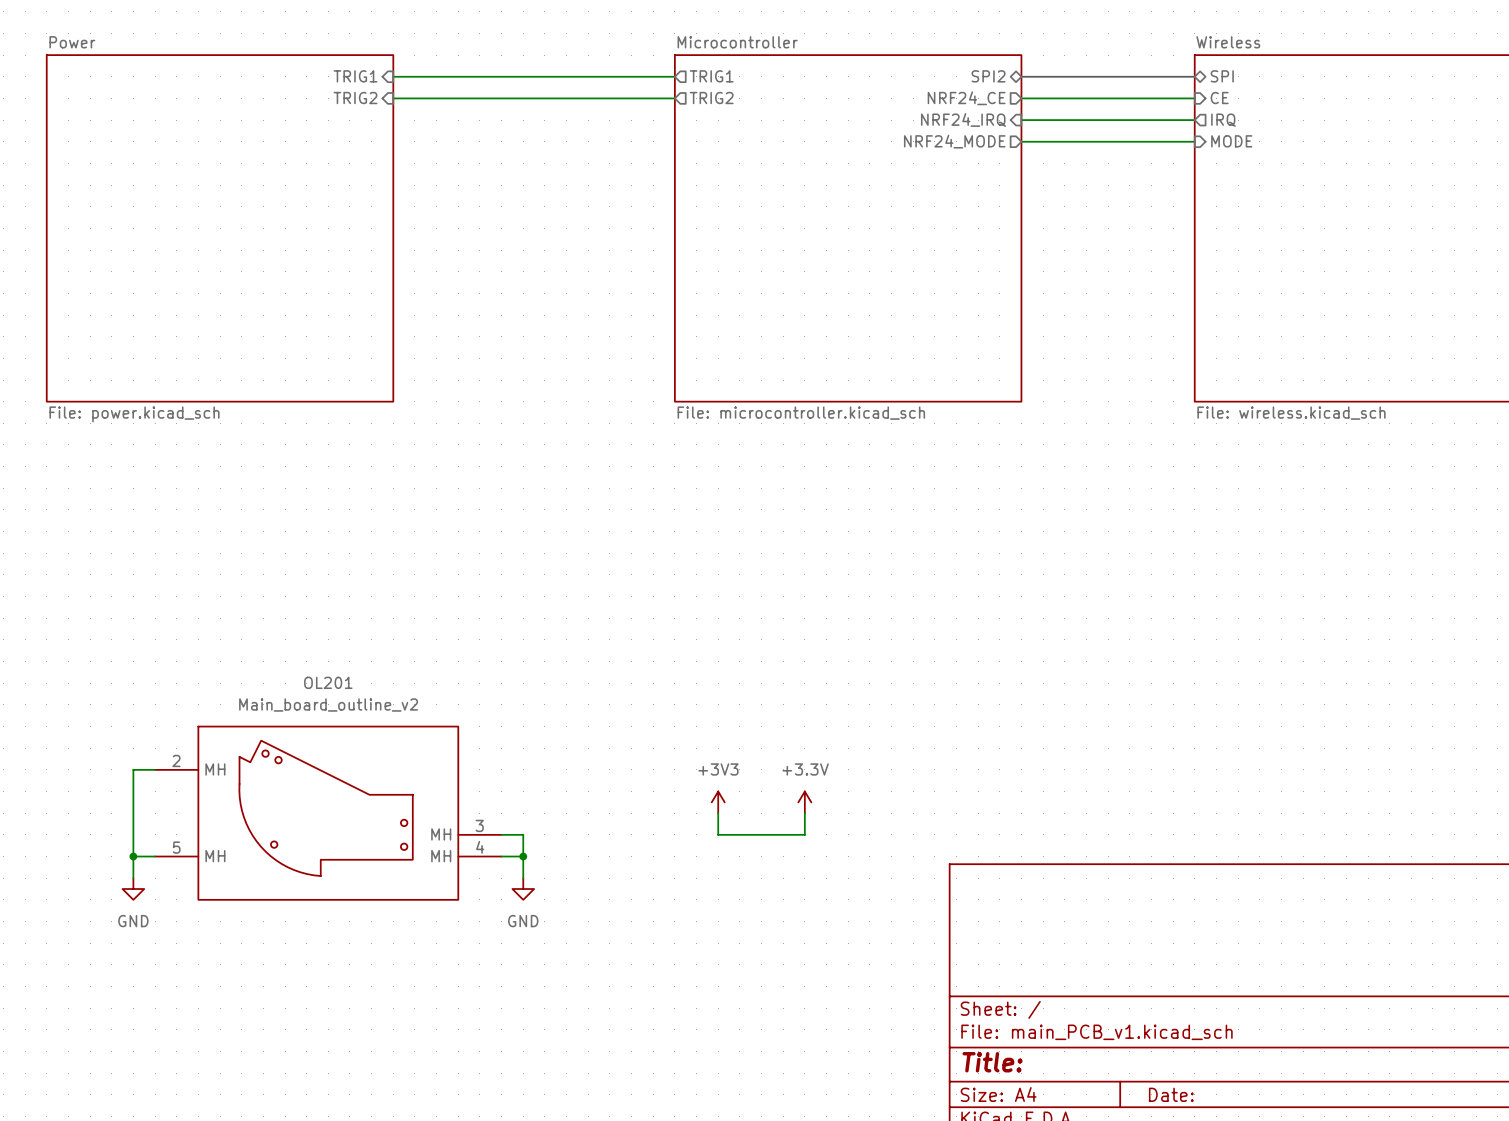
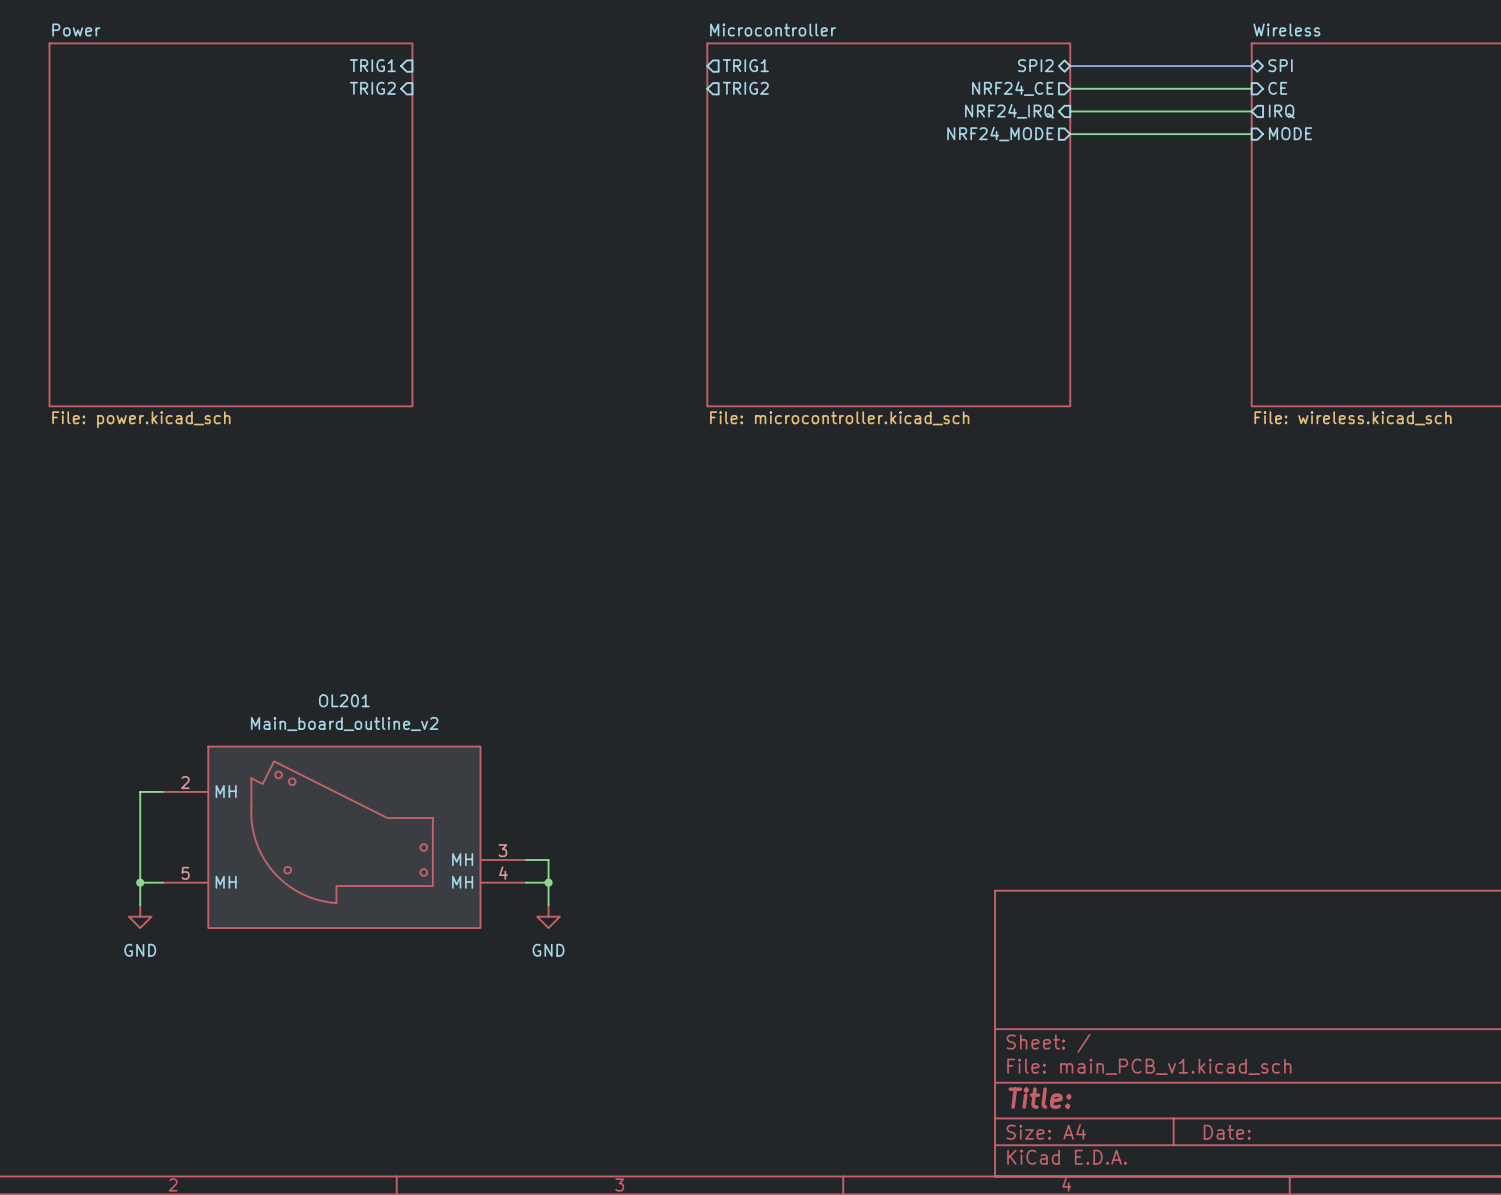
wire: (393, 76) (674, 76) -> none
wire: (393, 98) (674, 98) -> none
power symbol: +3V3 (718, 802) -> none
power symbol: +3.3V (804, 802) -> none
wire: (718, 813) (718, 834) (804, 834) (804, 813) -> none

